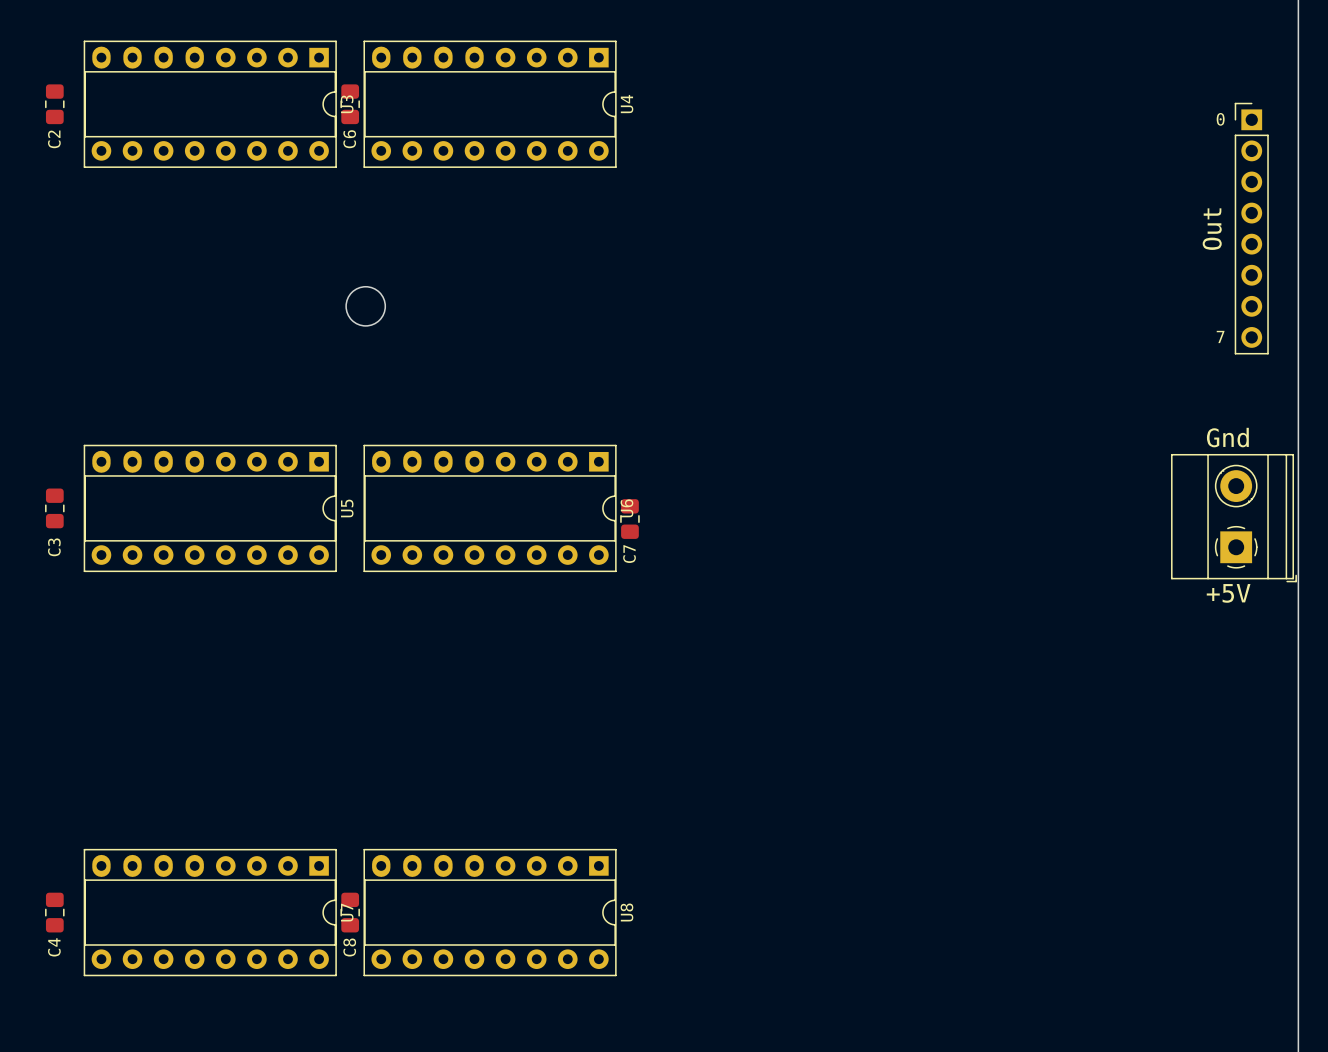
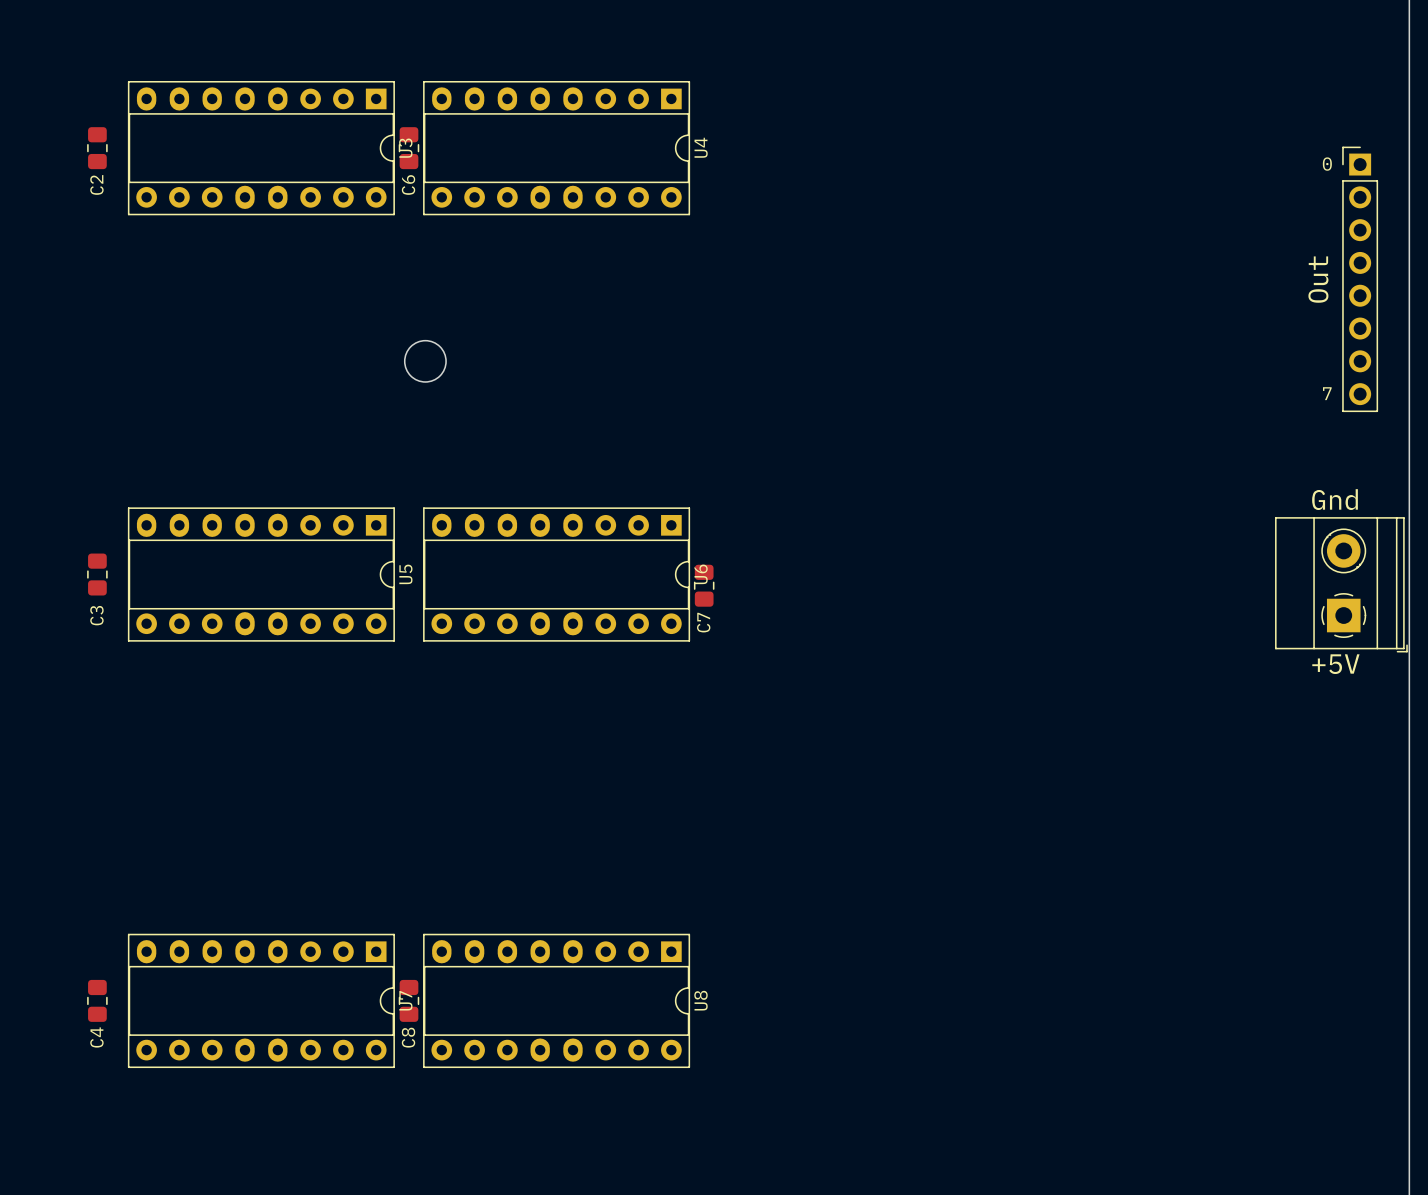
U3 footprint: [83, 40, 337, 168] -> [127, 81, 395, 216]
U4 footprint: [363, 40, 617, 168] -> [423, 81, 691, 216]
U5 footprint: [83, 444, 337, 573] -> [127, 507, 395, 642]
U6 footprint: [363, 444, 617, 573] -> [423, 507, 691, 642]
U7 footprint: [83, 848, 337, 977] -> [127, 933, 395, 1069]
U8 footprint: [363, 848, 617, 977] -> [423, 933, 691, 1069]

